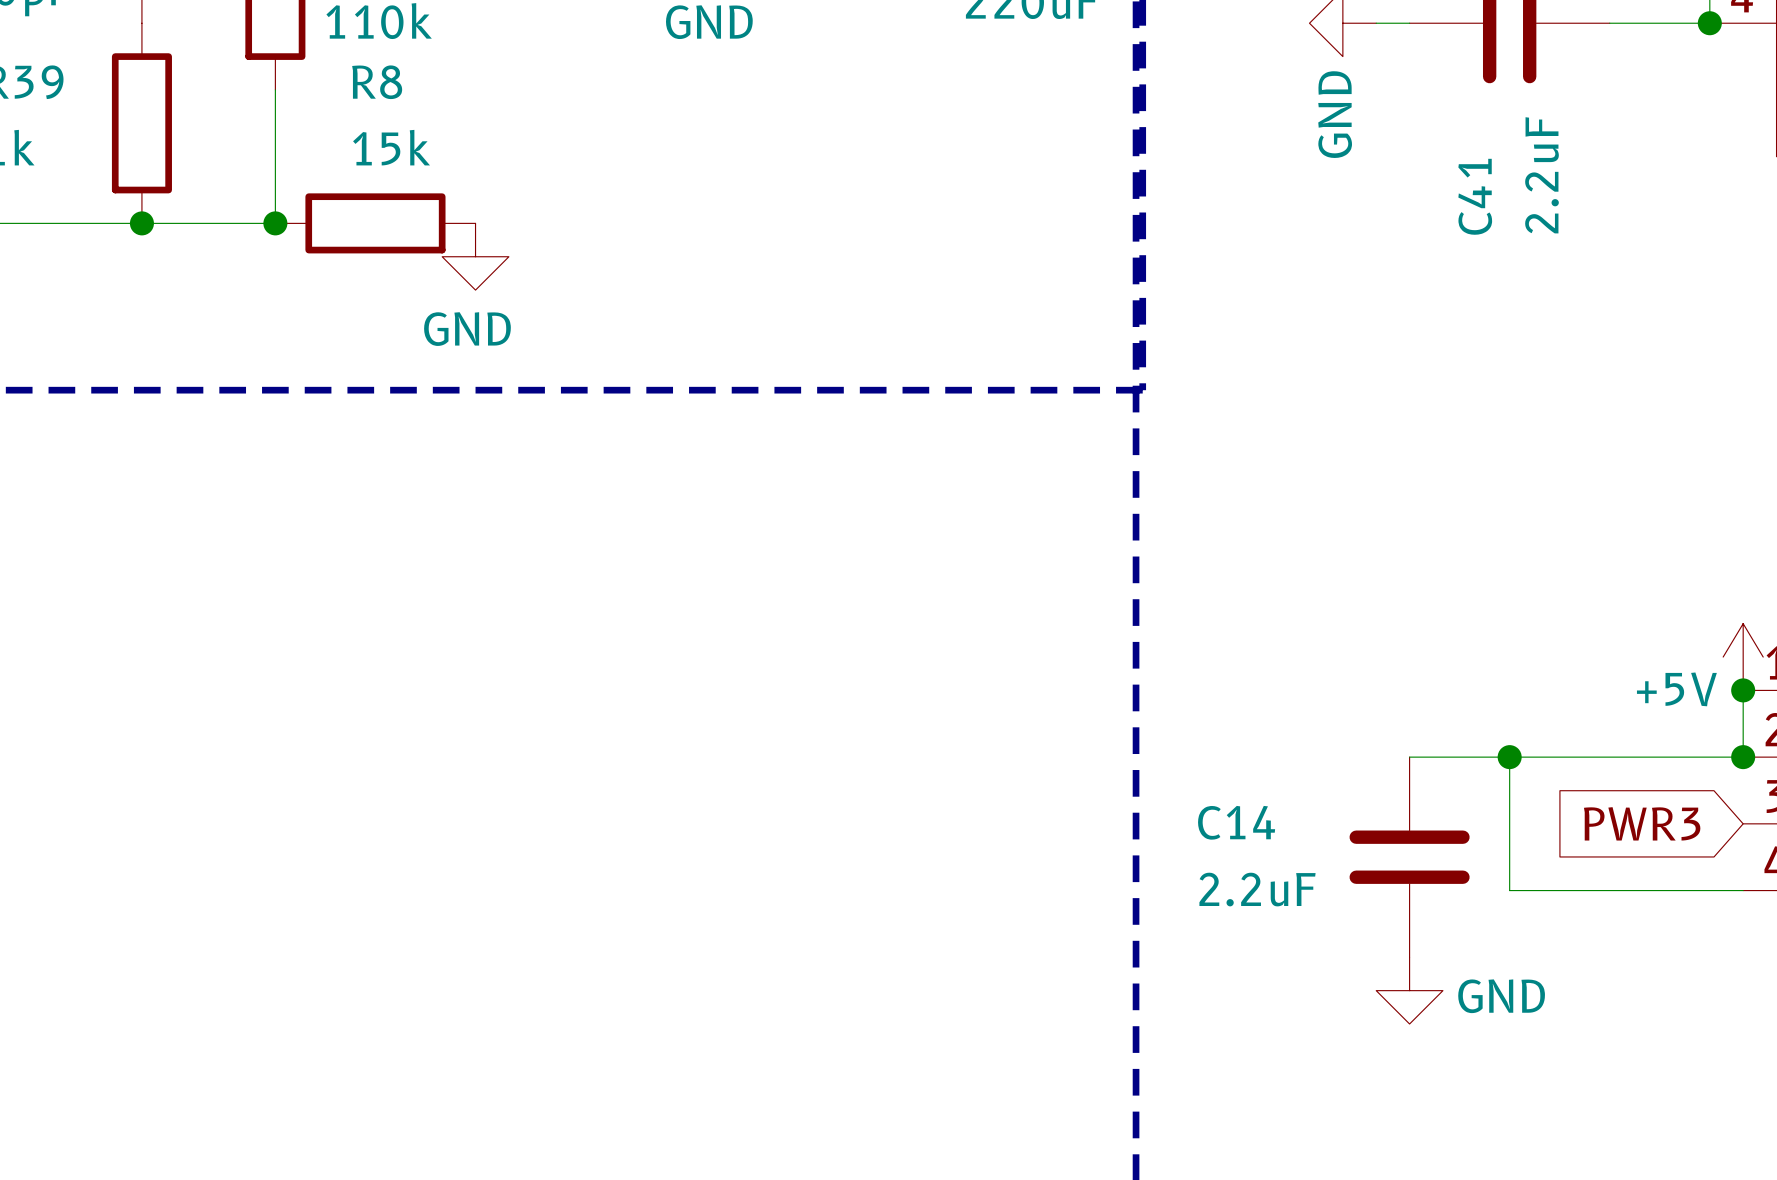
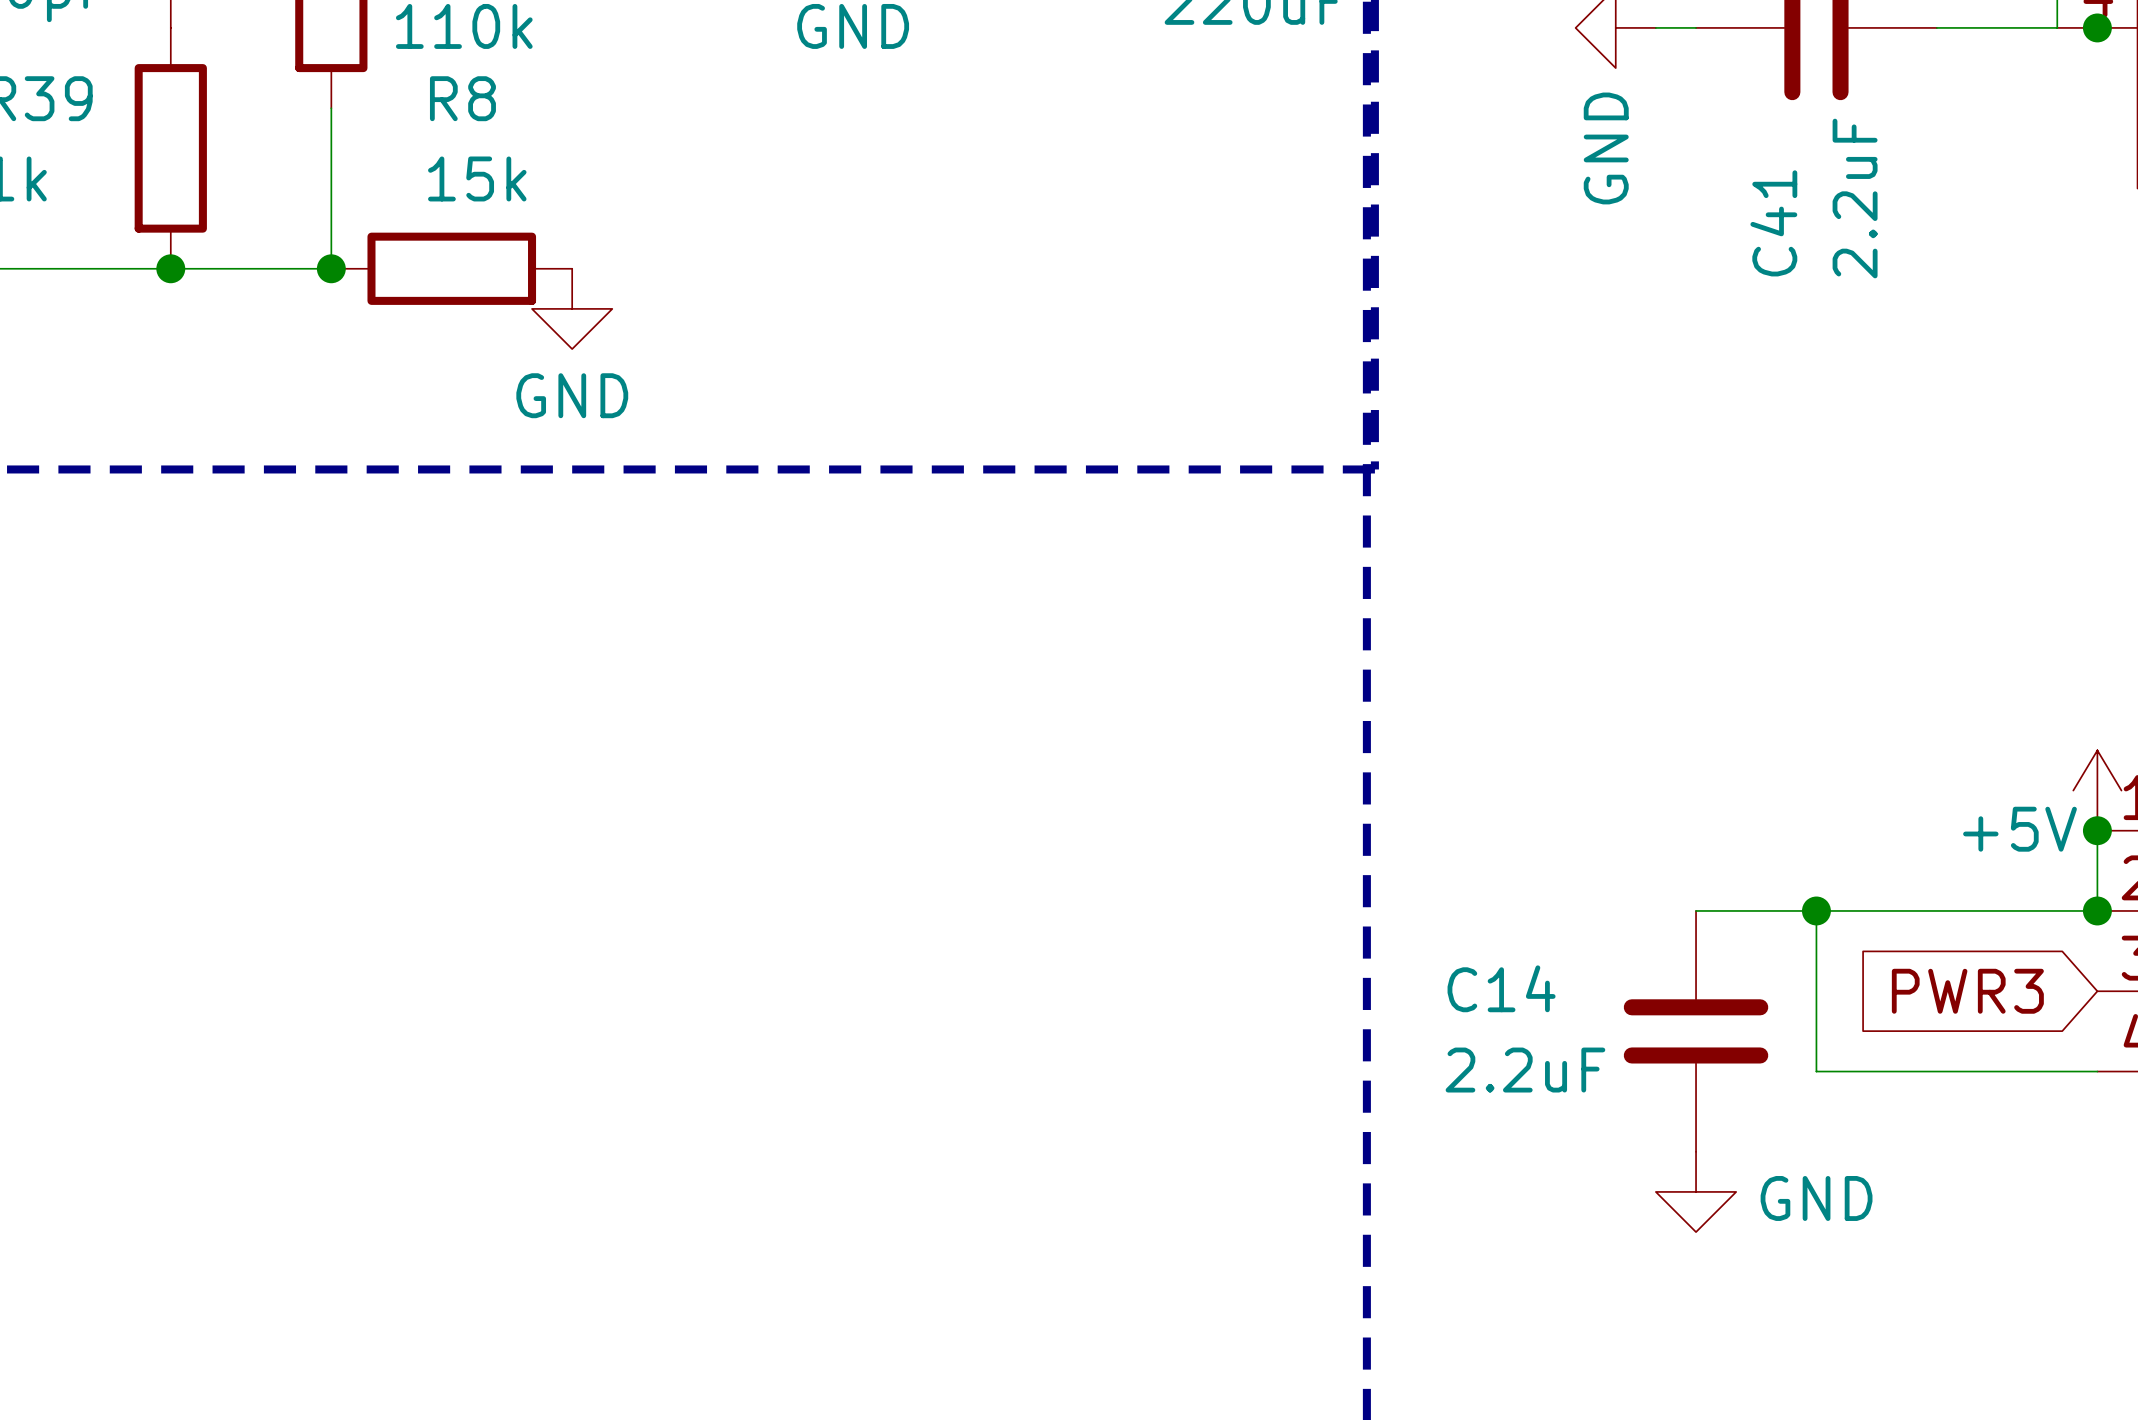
junction position: (1709, 23) -> (2097, 27)

